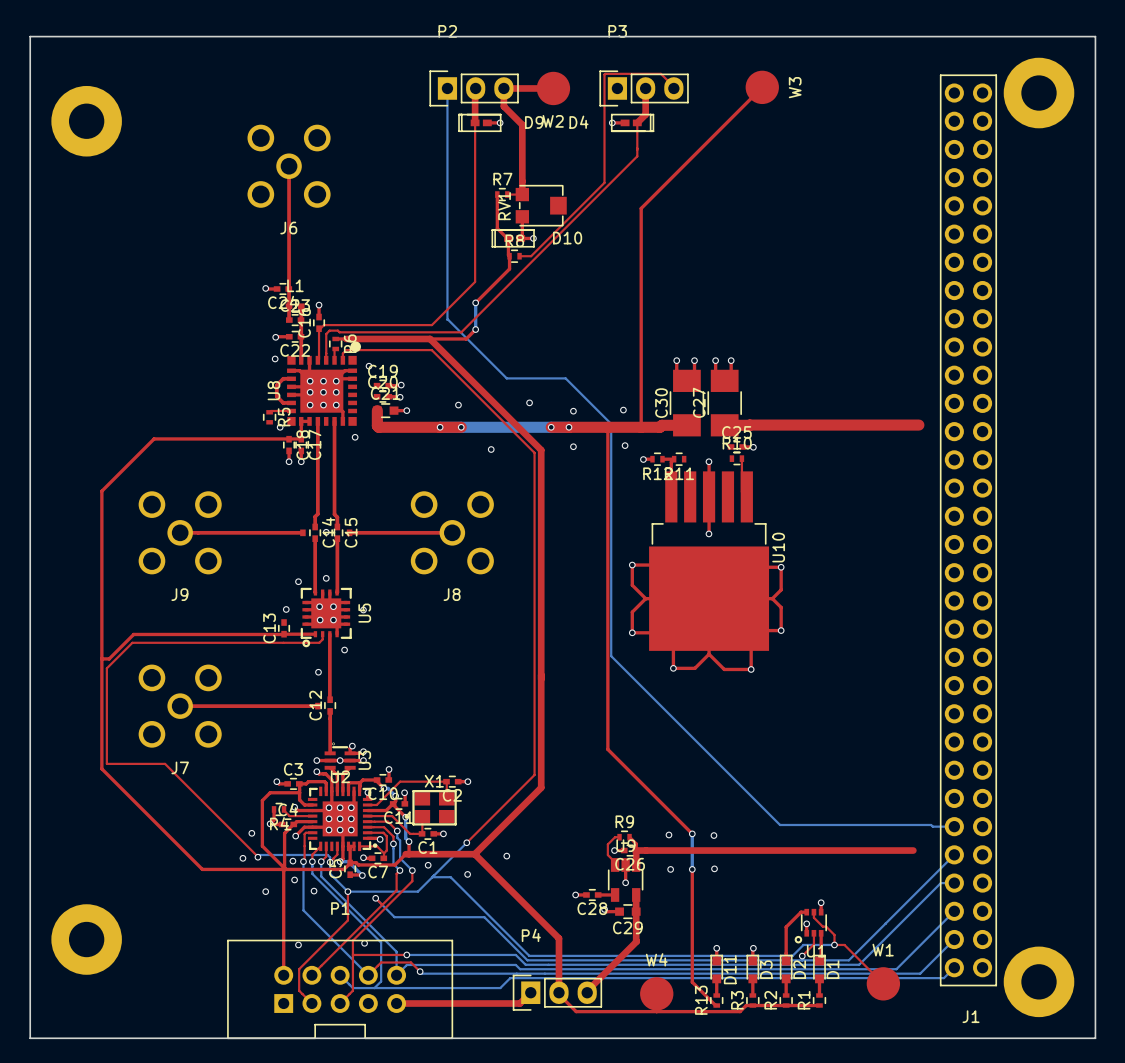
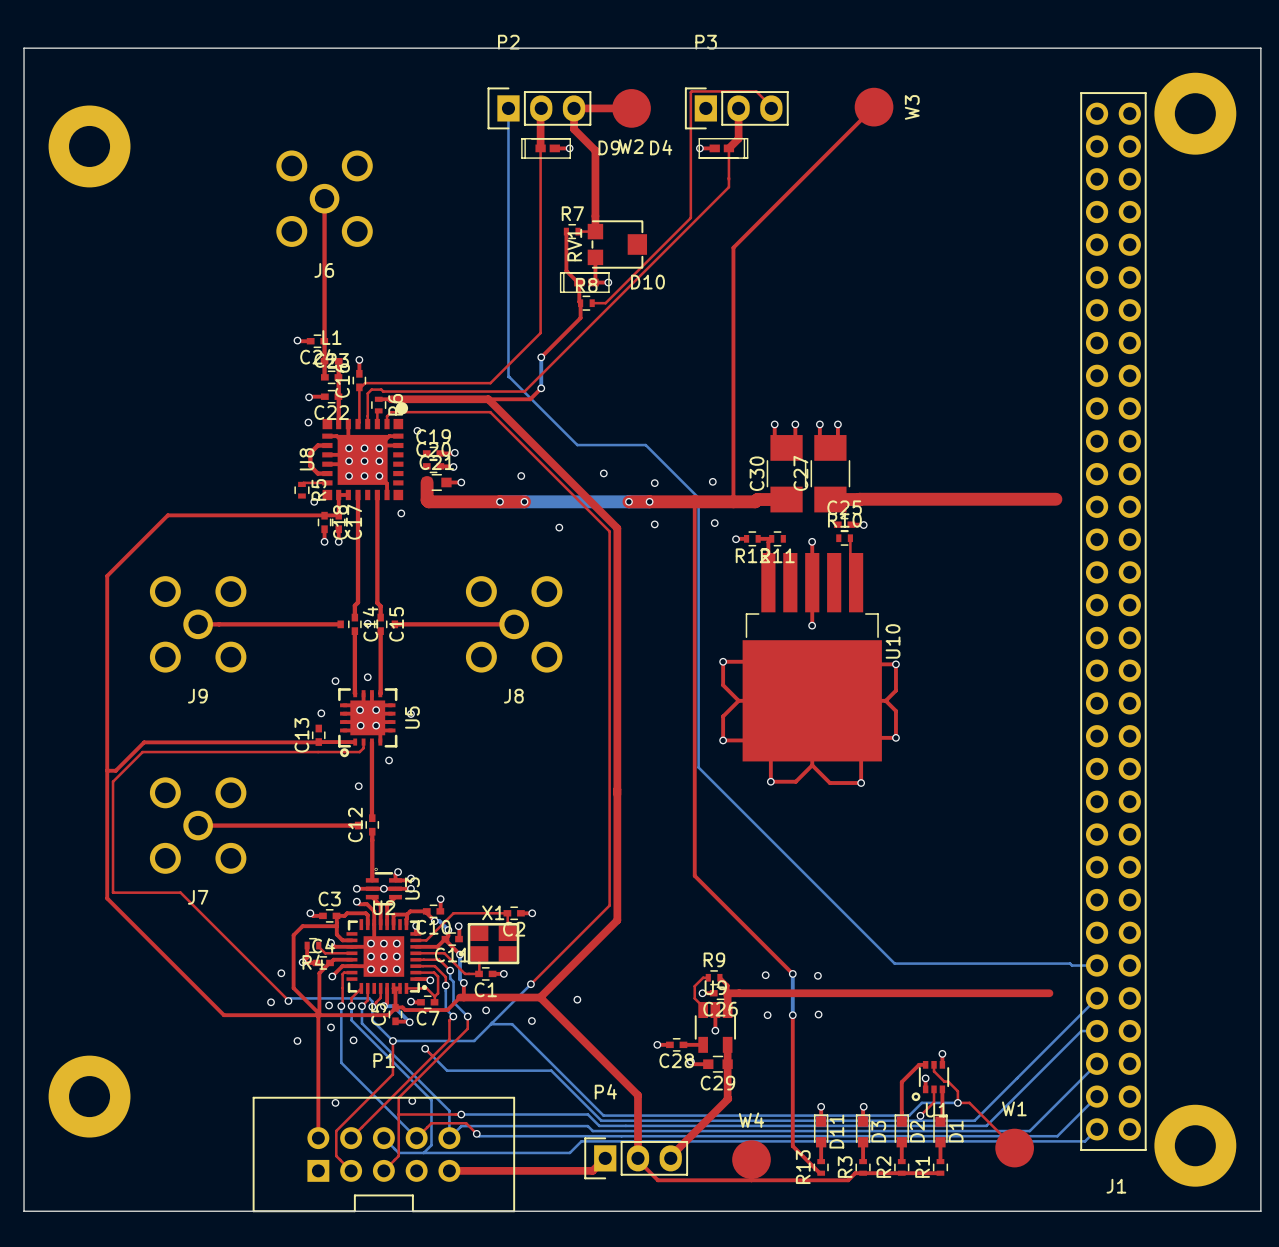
top track: (354, 791) (354, 804) (351, 807) -> none
top track: (340, 829) (342, 832) (342, 846) -> none

